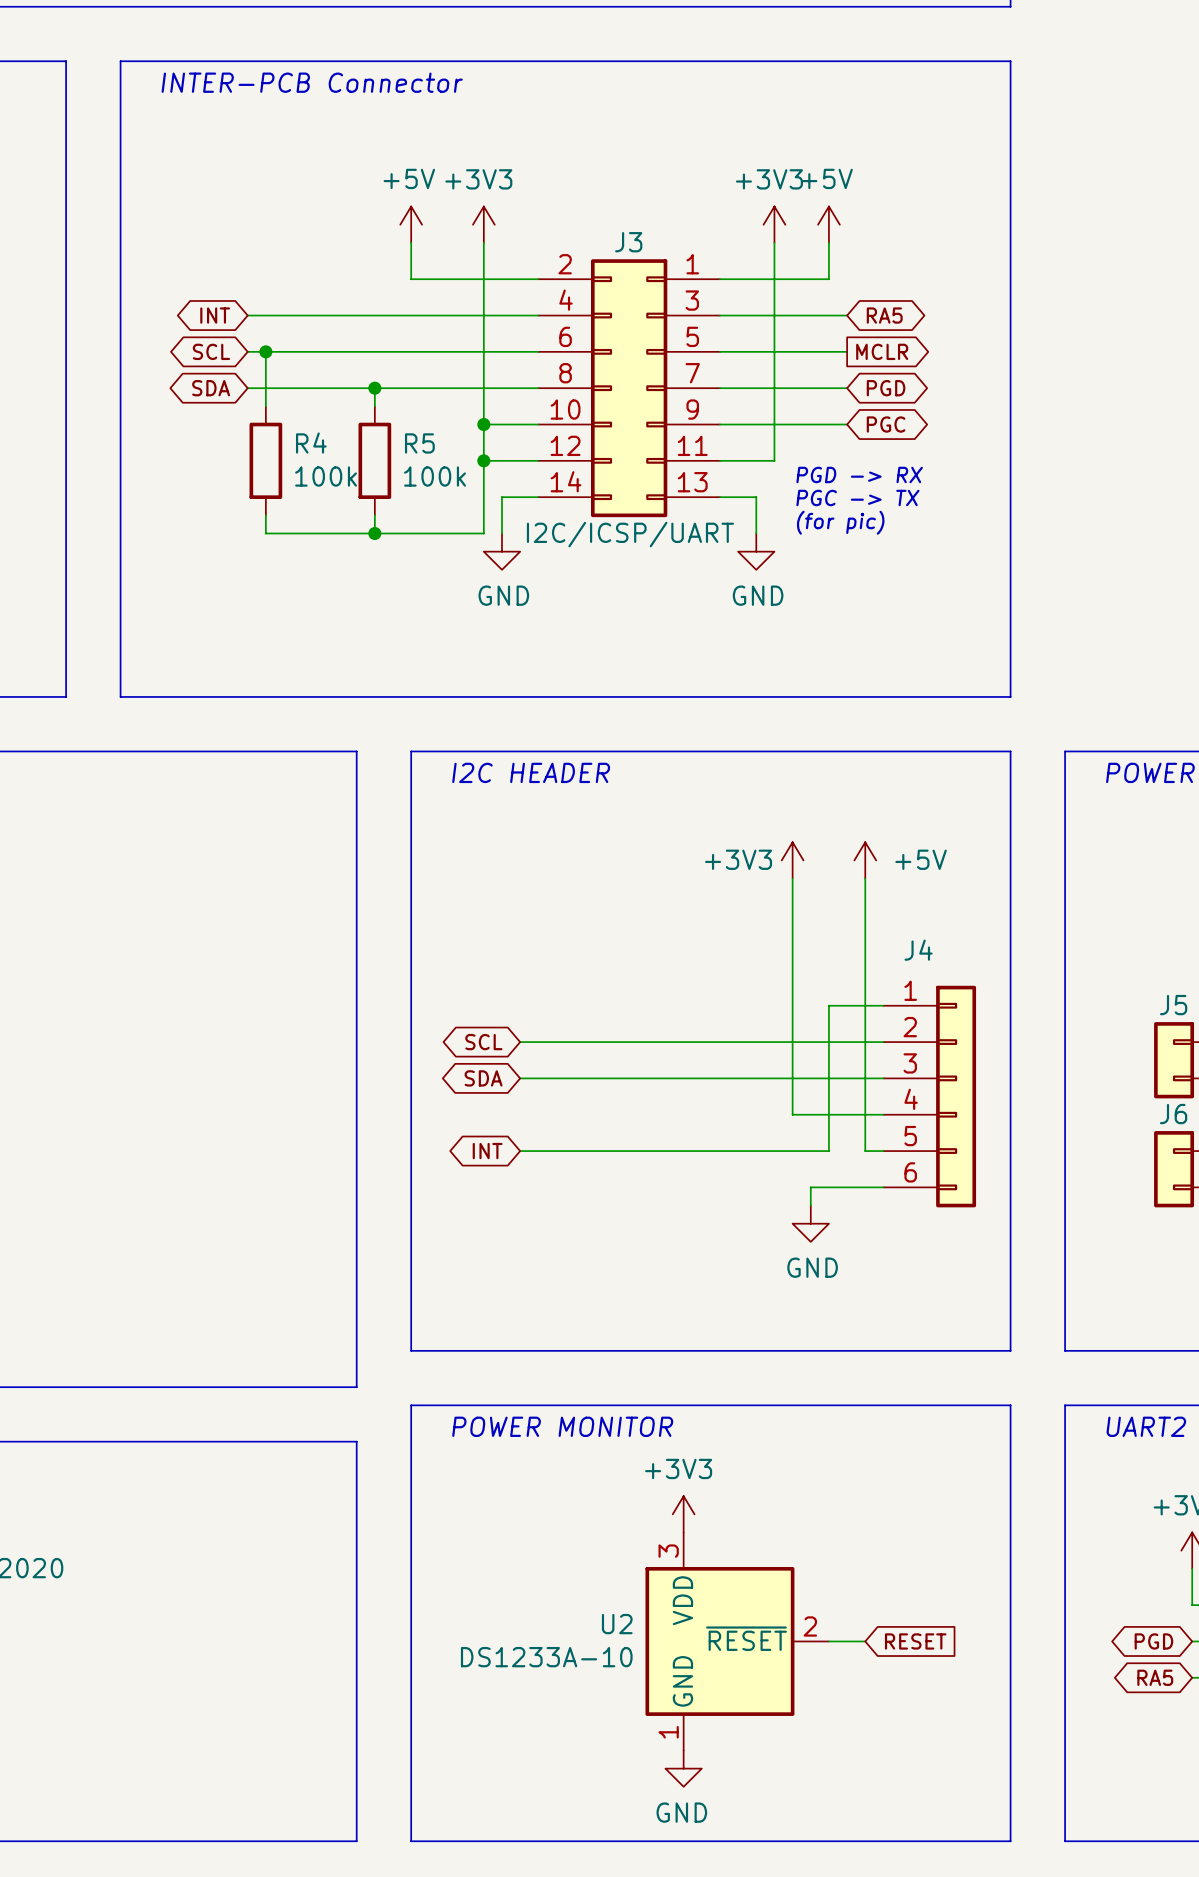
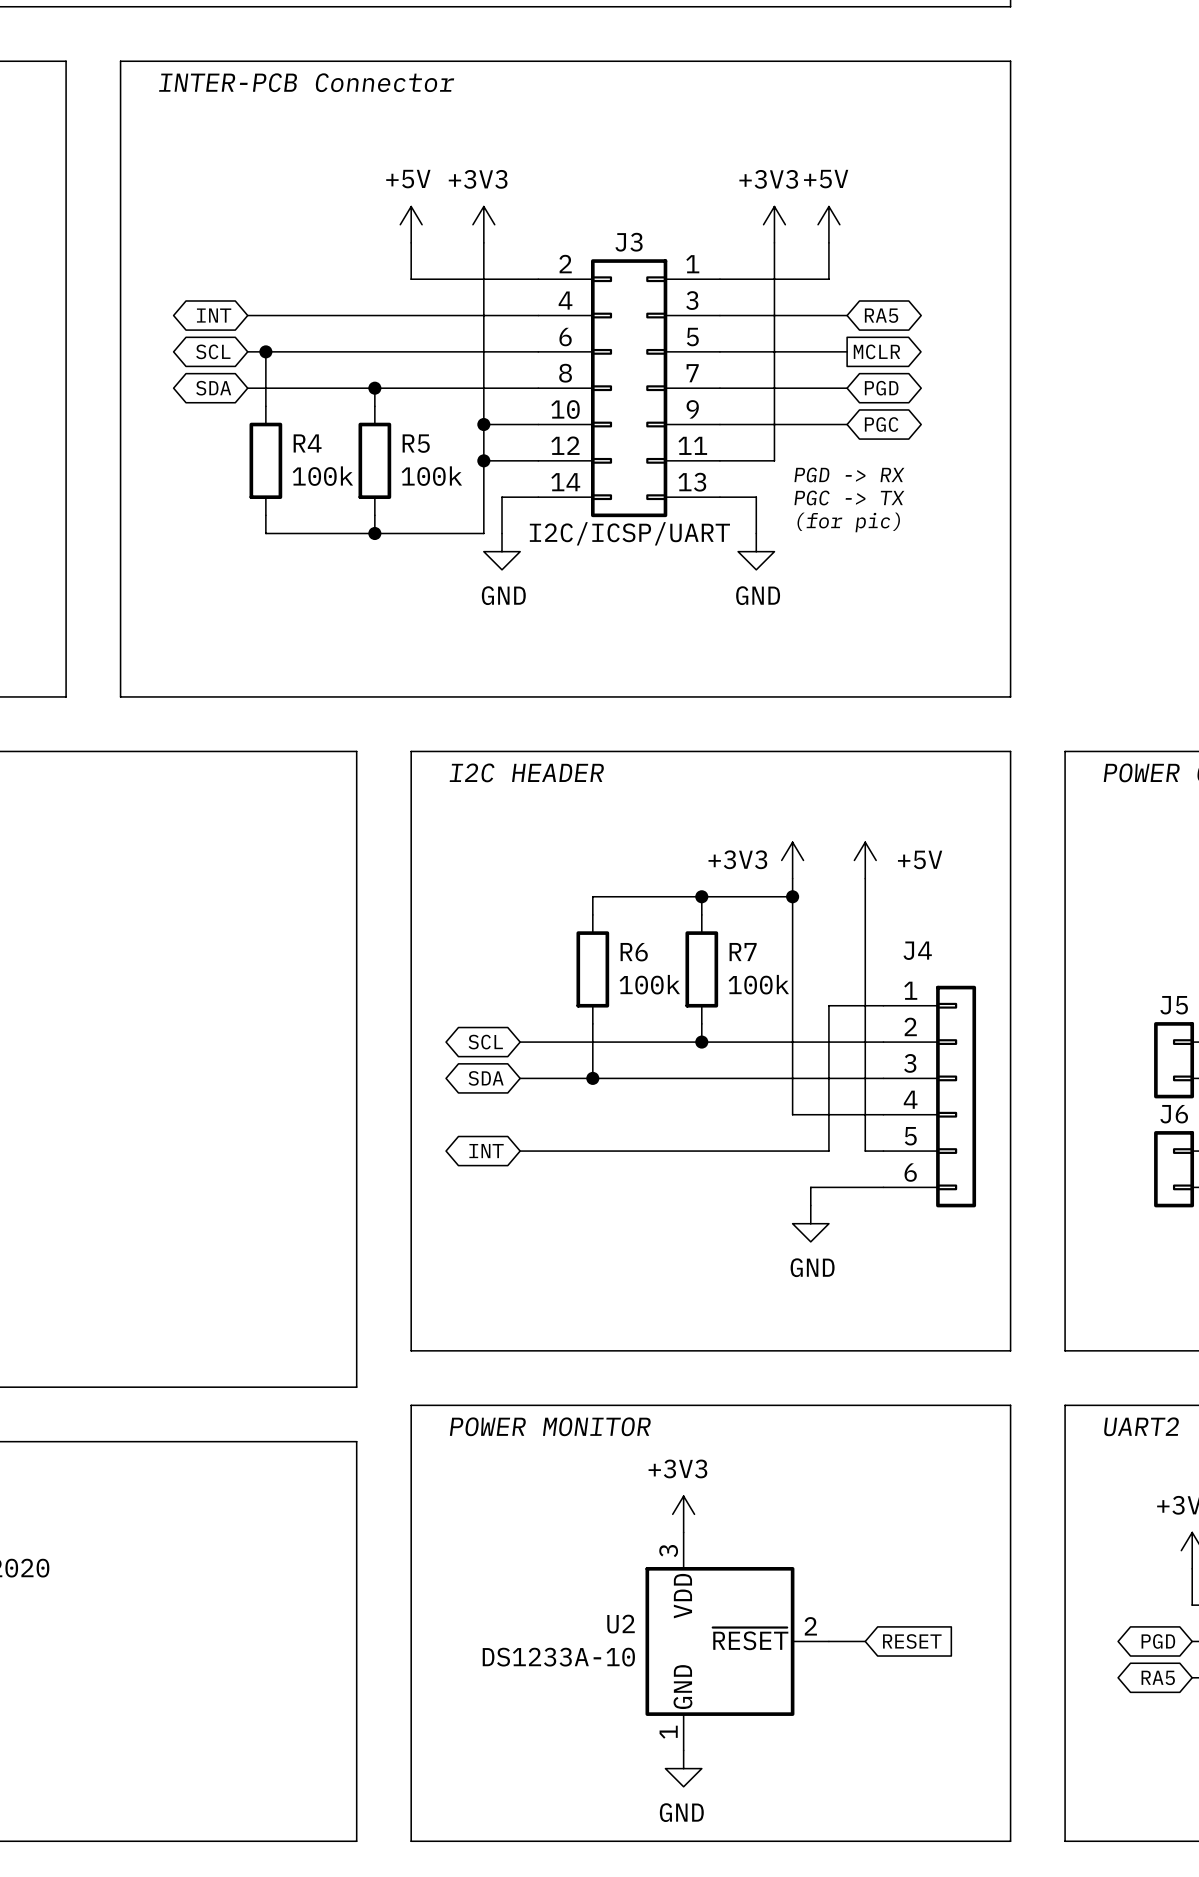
wire: none -> (701, 896) (701, 914)
junction: none -> (701, 896)
wire: none -> (792, 896) (592, 896) (592, 914)
junction: none -> (792, 896)
R6: none -> 100k (592, 969)
R7: none -> 100k (701, 969)
wire: none -> (592, 1023) (592, 1078)
wire: none -> (701, 1023) (701, 1042)
junction: none -> (701, 1042)
junction: none -> (592, 1078)

